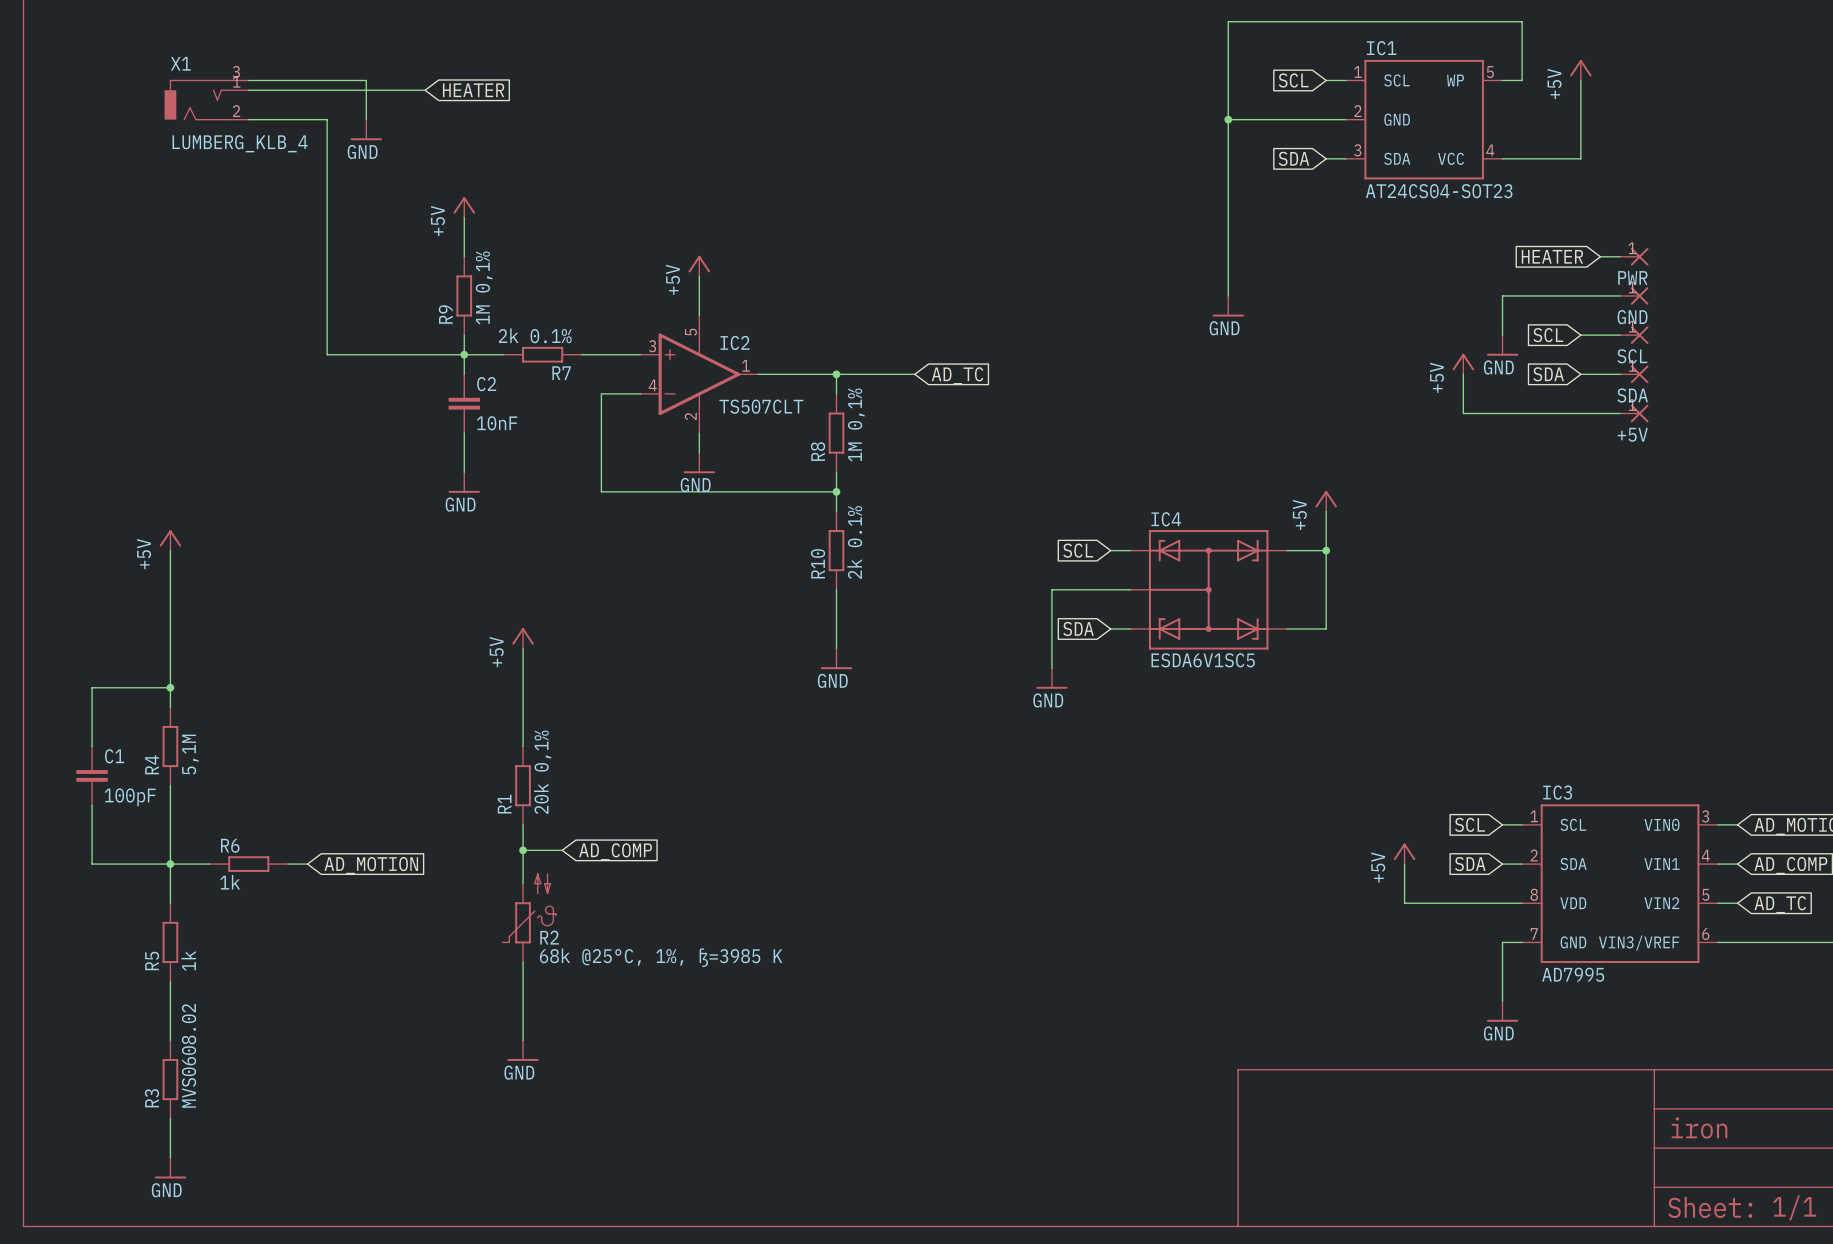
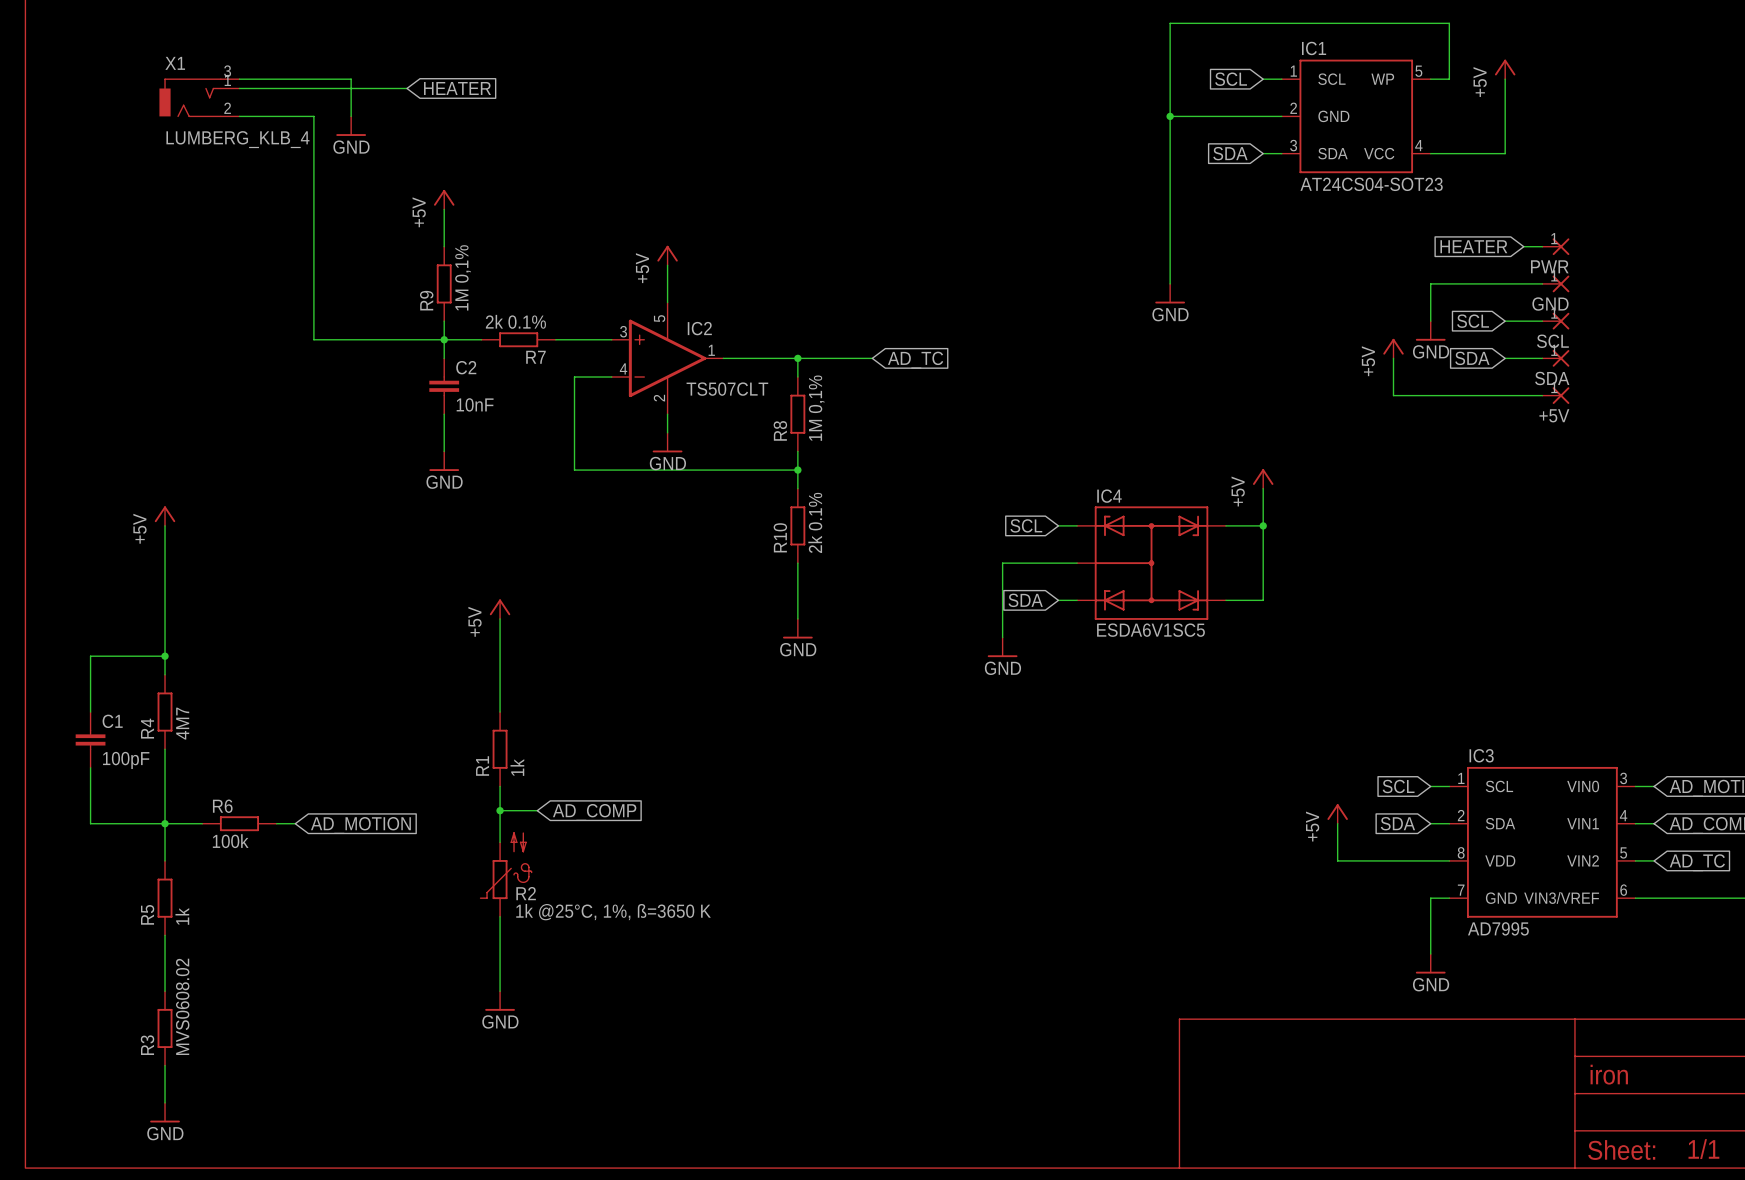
R4 value: 5,1M (190, 754) -> 4M7 (182, 723)
R1 value: 20k 0,1% (542, 772) -> 1k (517, 767)
R6 value: 1k (230, 882) -> 100k (230, 841)
R2 value: 68k @25°C, 1%, ß=3985 K (661, 957) -> 1k @25°C, 1%, ß=3650 K (613, 912)

